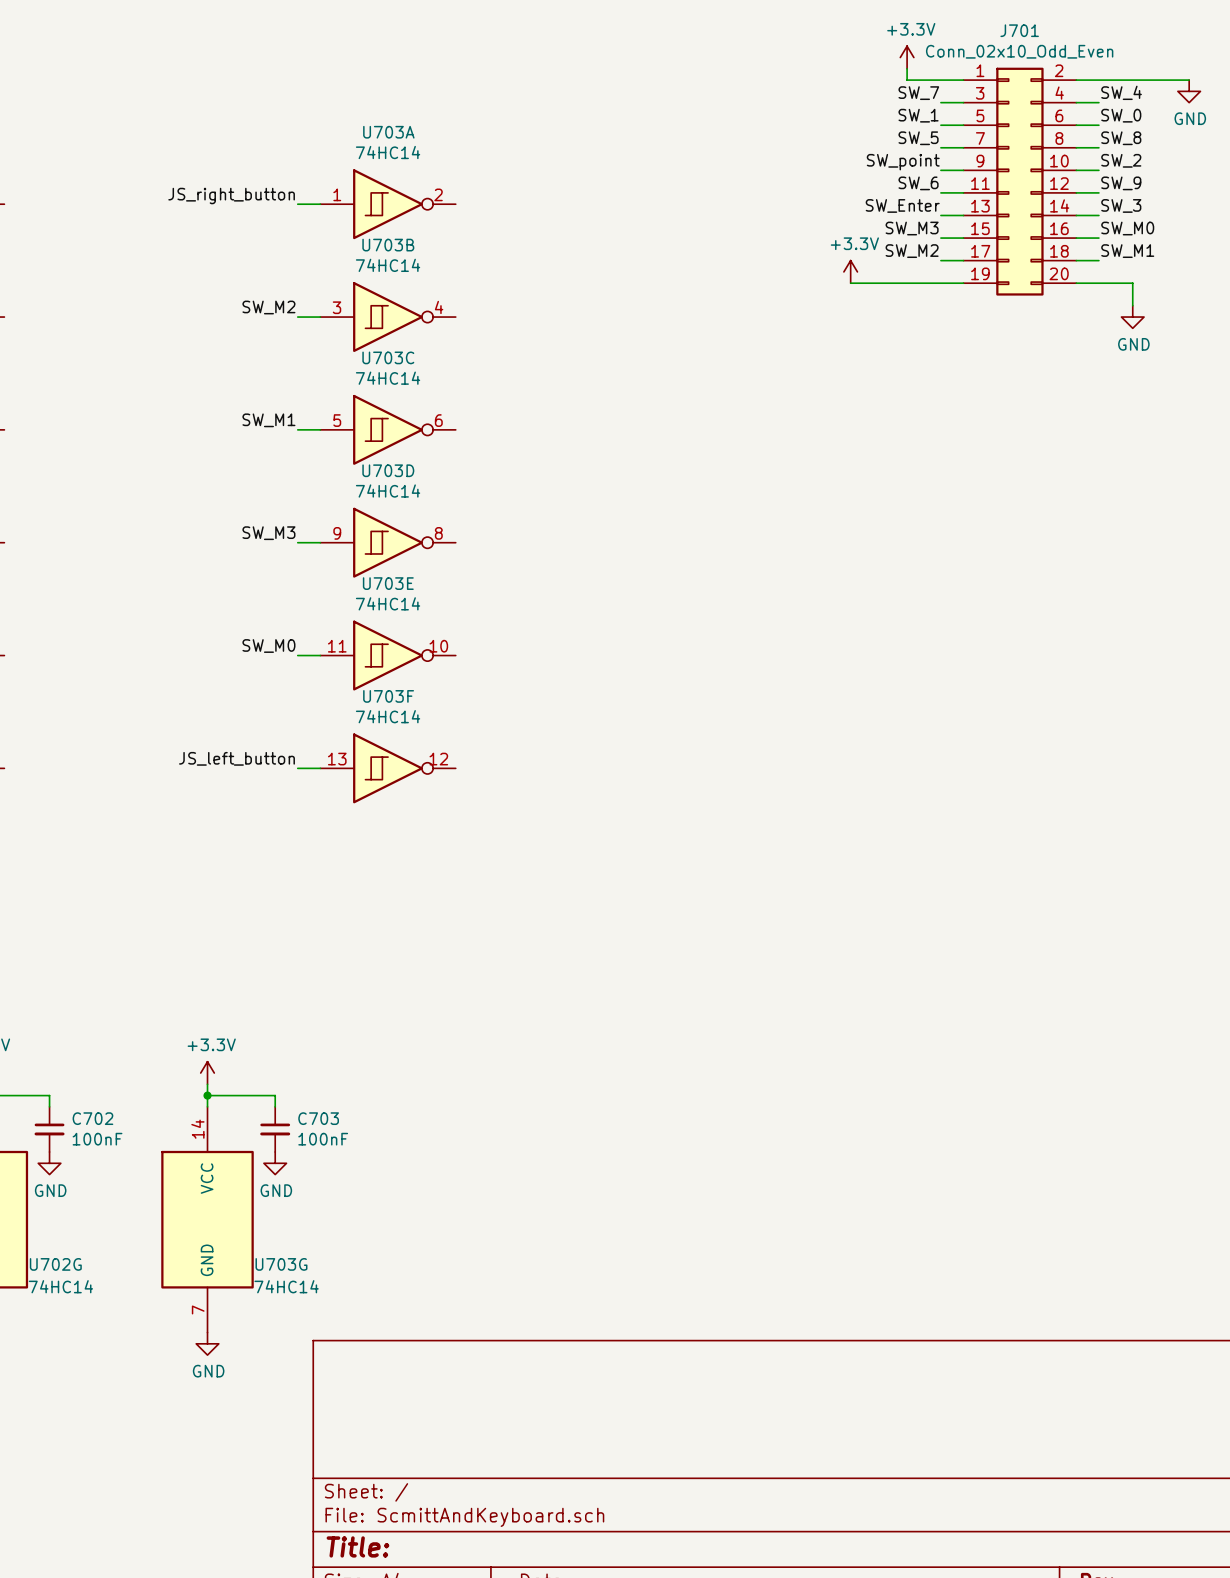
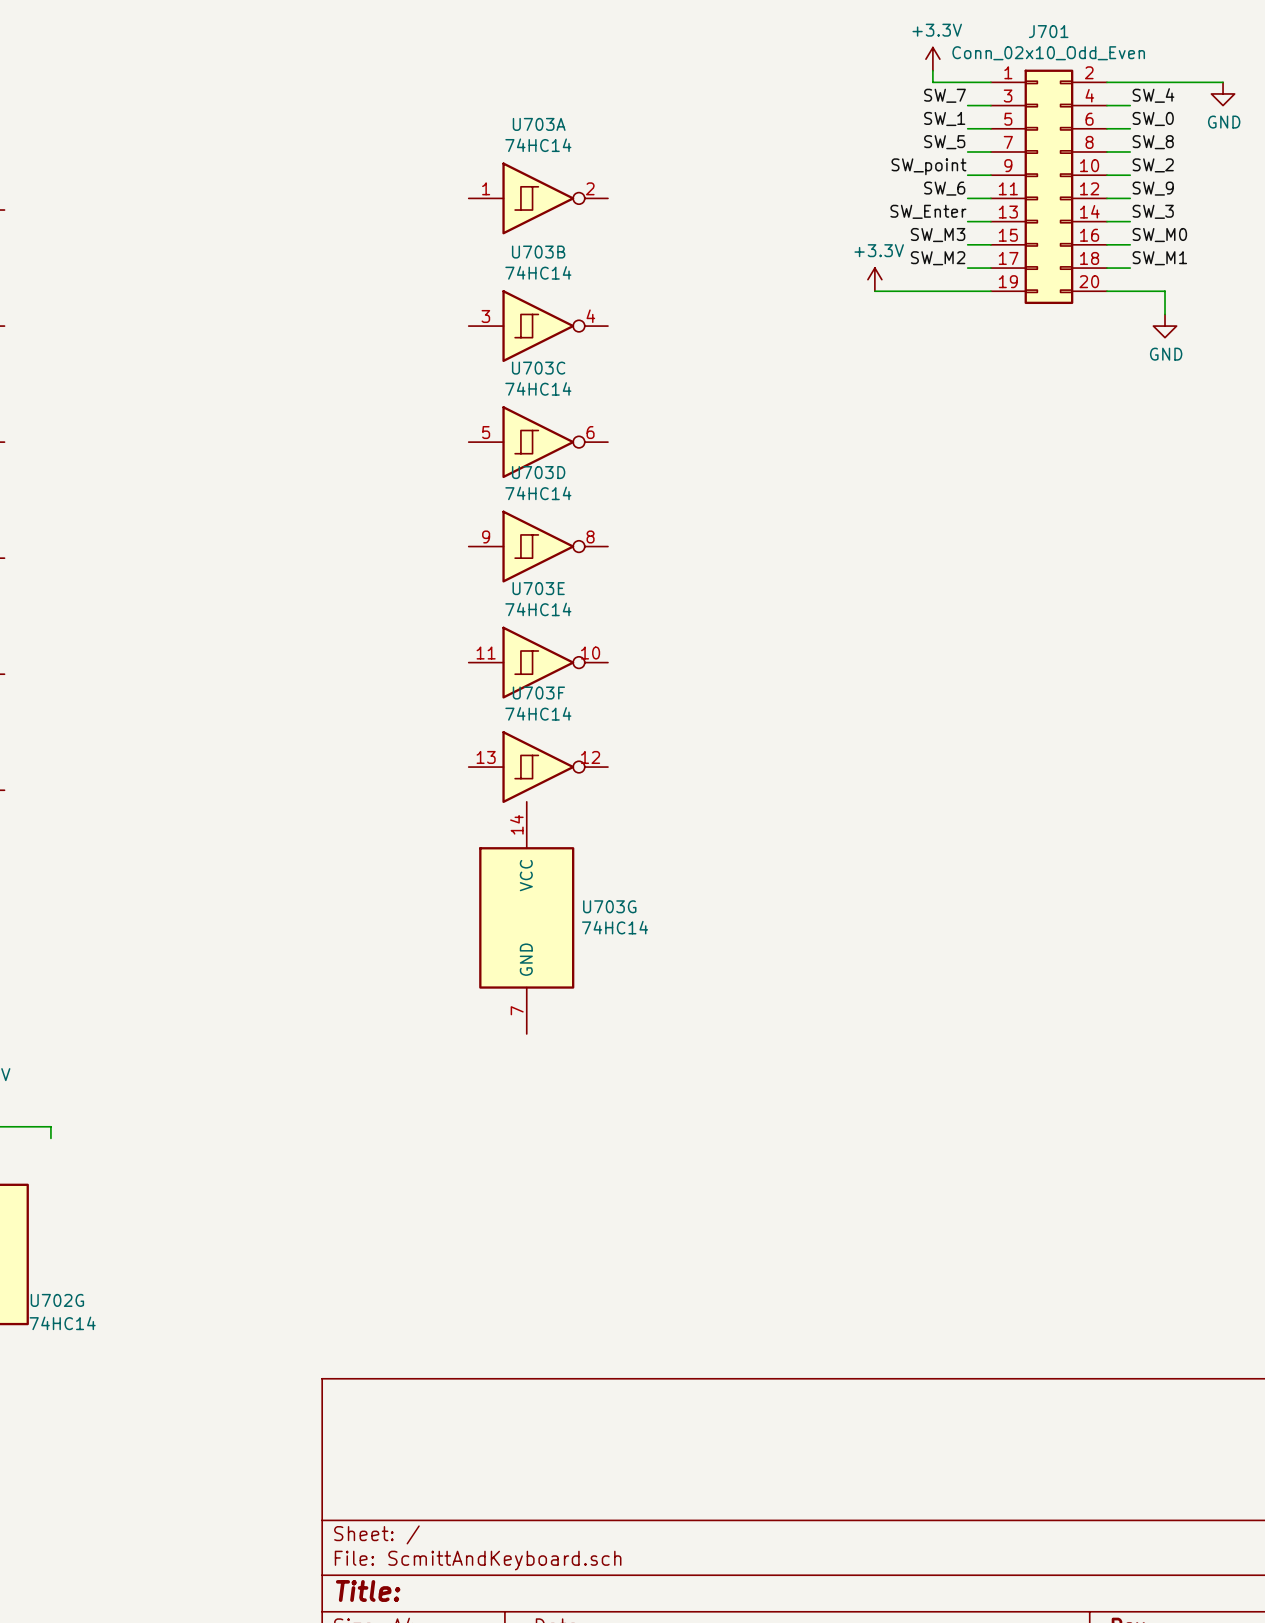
label: JS_right_button (231, 196) -> none
wire: (297, 204) (320, 204) -> none
U703A position: (388, 204) -> (538, 198)
label: SW_M2 (268, 307) -> none
wire: (297, 317) (320, 317) -> none
U703B position: (388, 317) -> (538, 326)
label: SW_M1 (268, 420) -> none
wire: (297, 429) (320, 429) -> none
U703C position: (388, 429) -> (538, 442)
label: SW_M3 (268, 533) -> none
wire: (297, 542) (320, 542) -> none
U703D position: (388, 542) -> (538, 546)
label: SW_M0 (268, 646) -> none
wire: (297, 655) (320, 655) -> none
U703E position: (388, 655) -> (538, 662)
label: JS_left_button (236, 758) -> none
wire: (297, 768) (320, 768) -> none
U703F position: (388, 768) -> (538, 767)
power symbol: +3.3V (207, 1073) -> none
wire: (207, 1084) (207, 1106) -> none
wire: (207, 1095) (275, 1095) (275, 1106) -> none
junction: (207, 1095) -> none
C702: 100nF (49, 1129) -> none
C703: 100nF (275, 1129) -> none
power symbol: GND (49, 1163) -> none
power symbol: GND (275, 1163) -> none
U703G position: (207, 1219) -> (526, 917)
U703G name position: U703G (281, 1264) -> U703G (609, 906)
U703G value position: 74HC14 (286, 1286) -> 74HC14 (615, 927)
power symbol: GND (207, 1343) -> none

